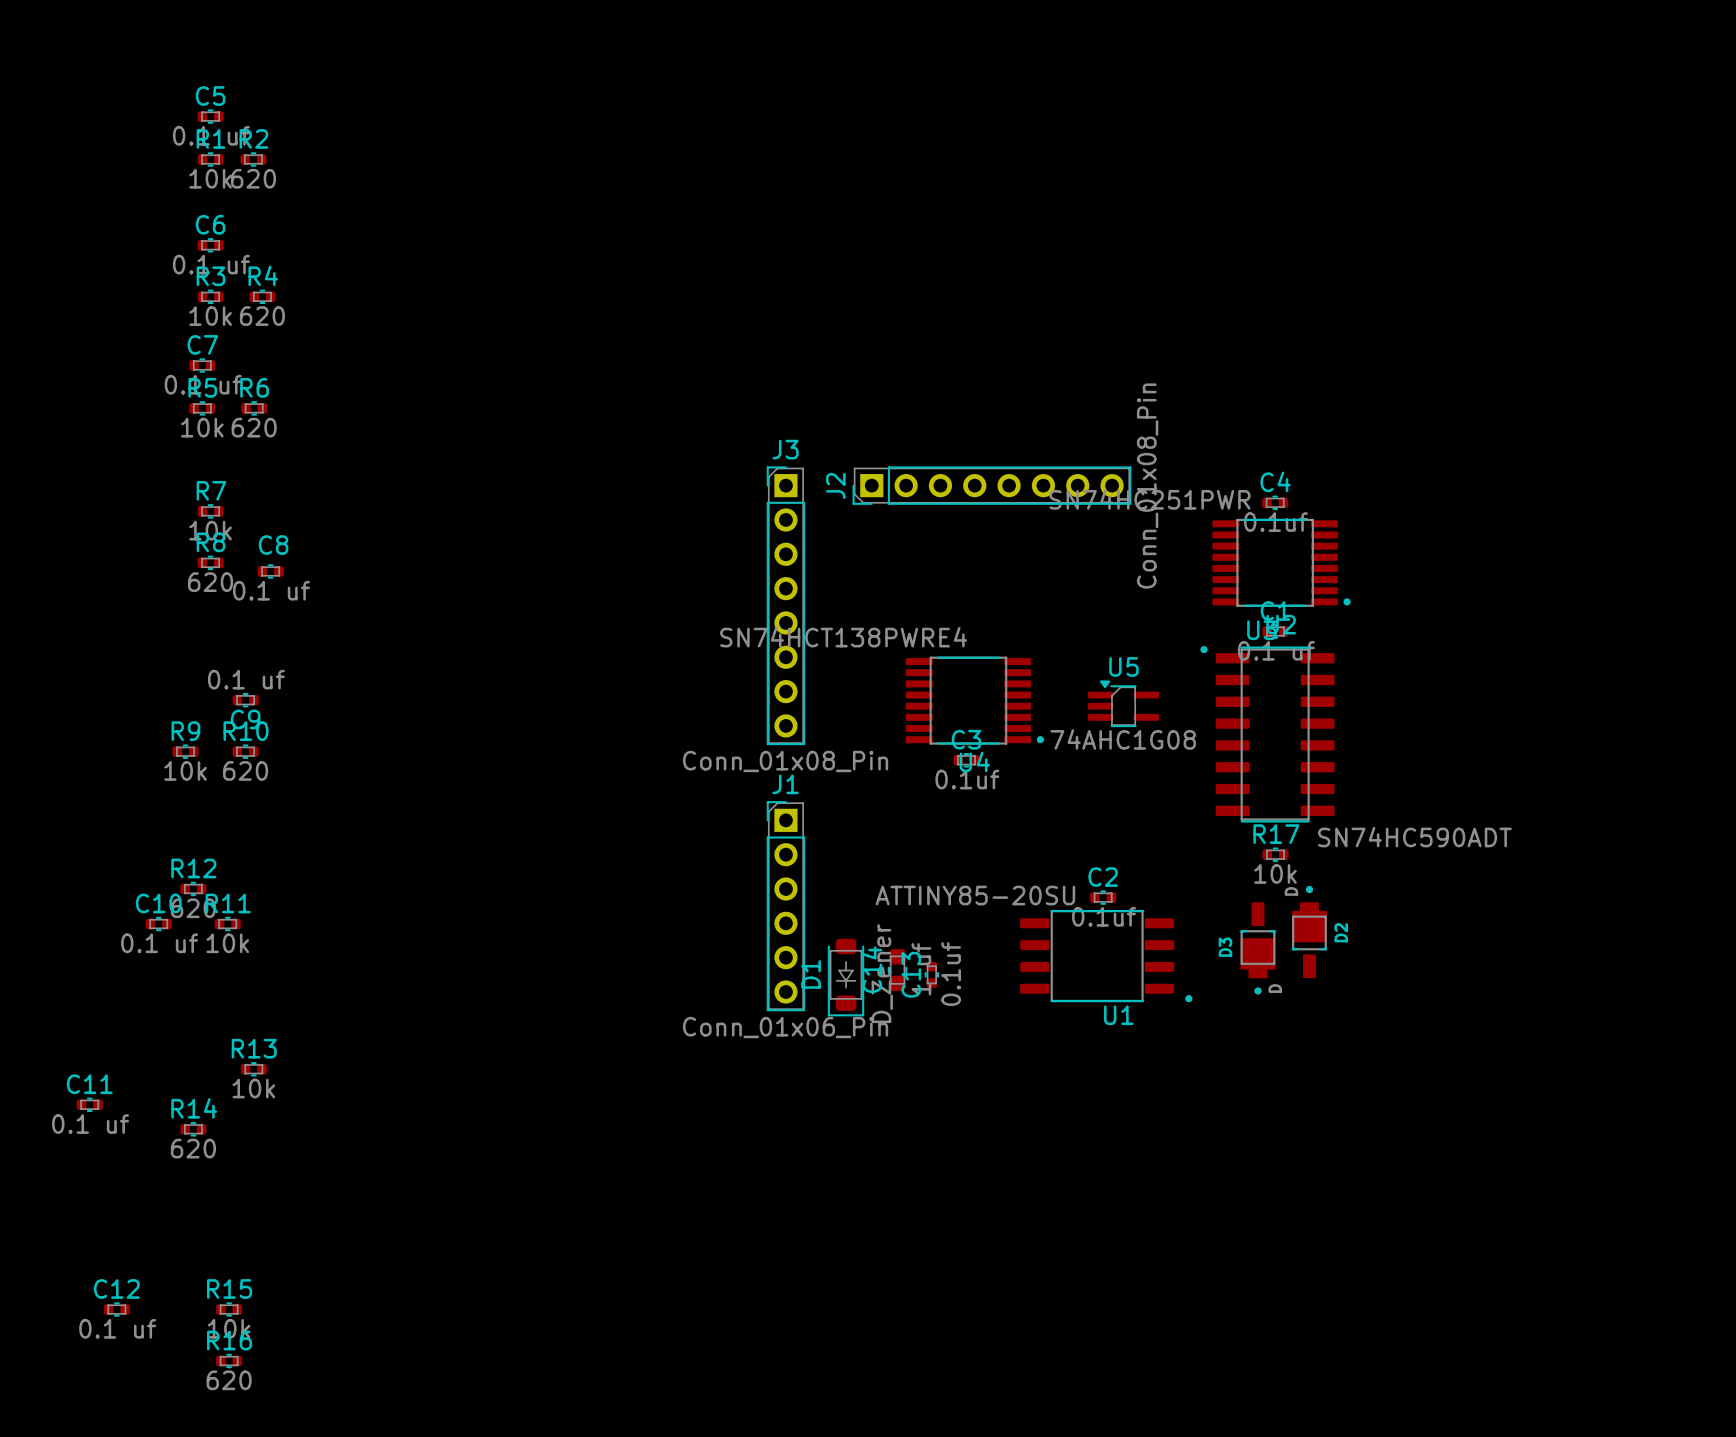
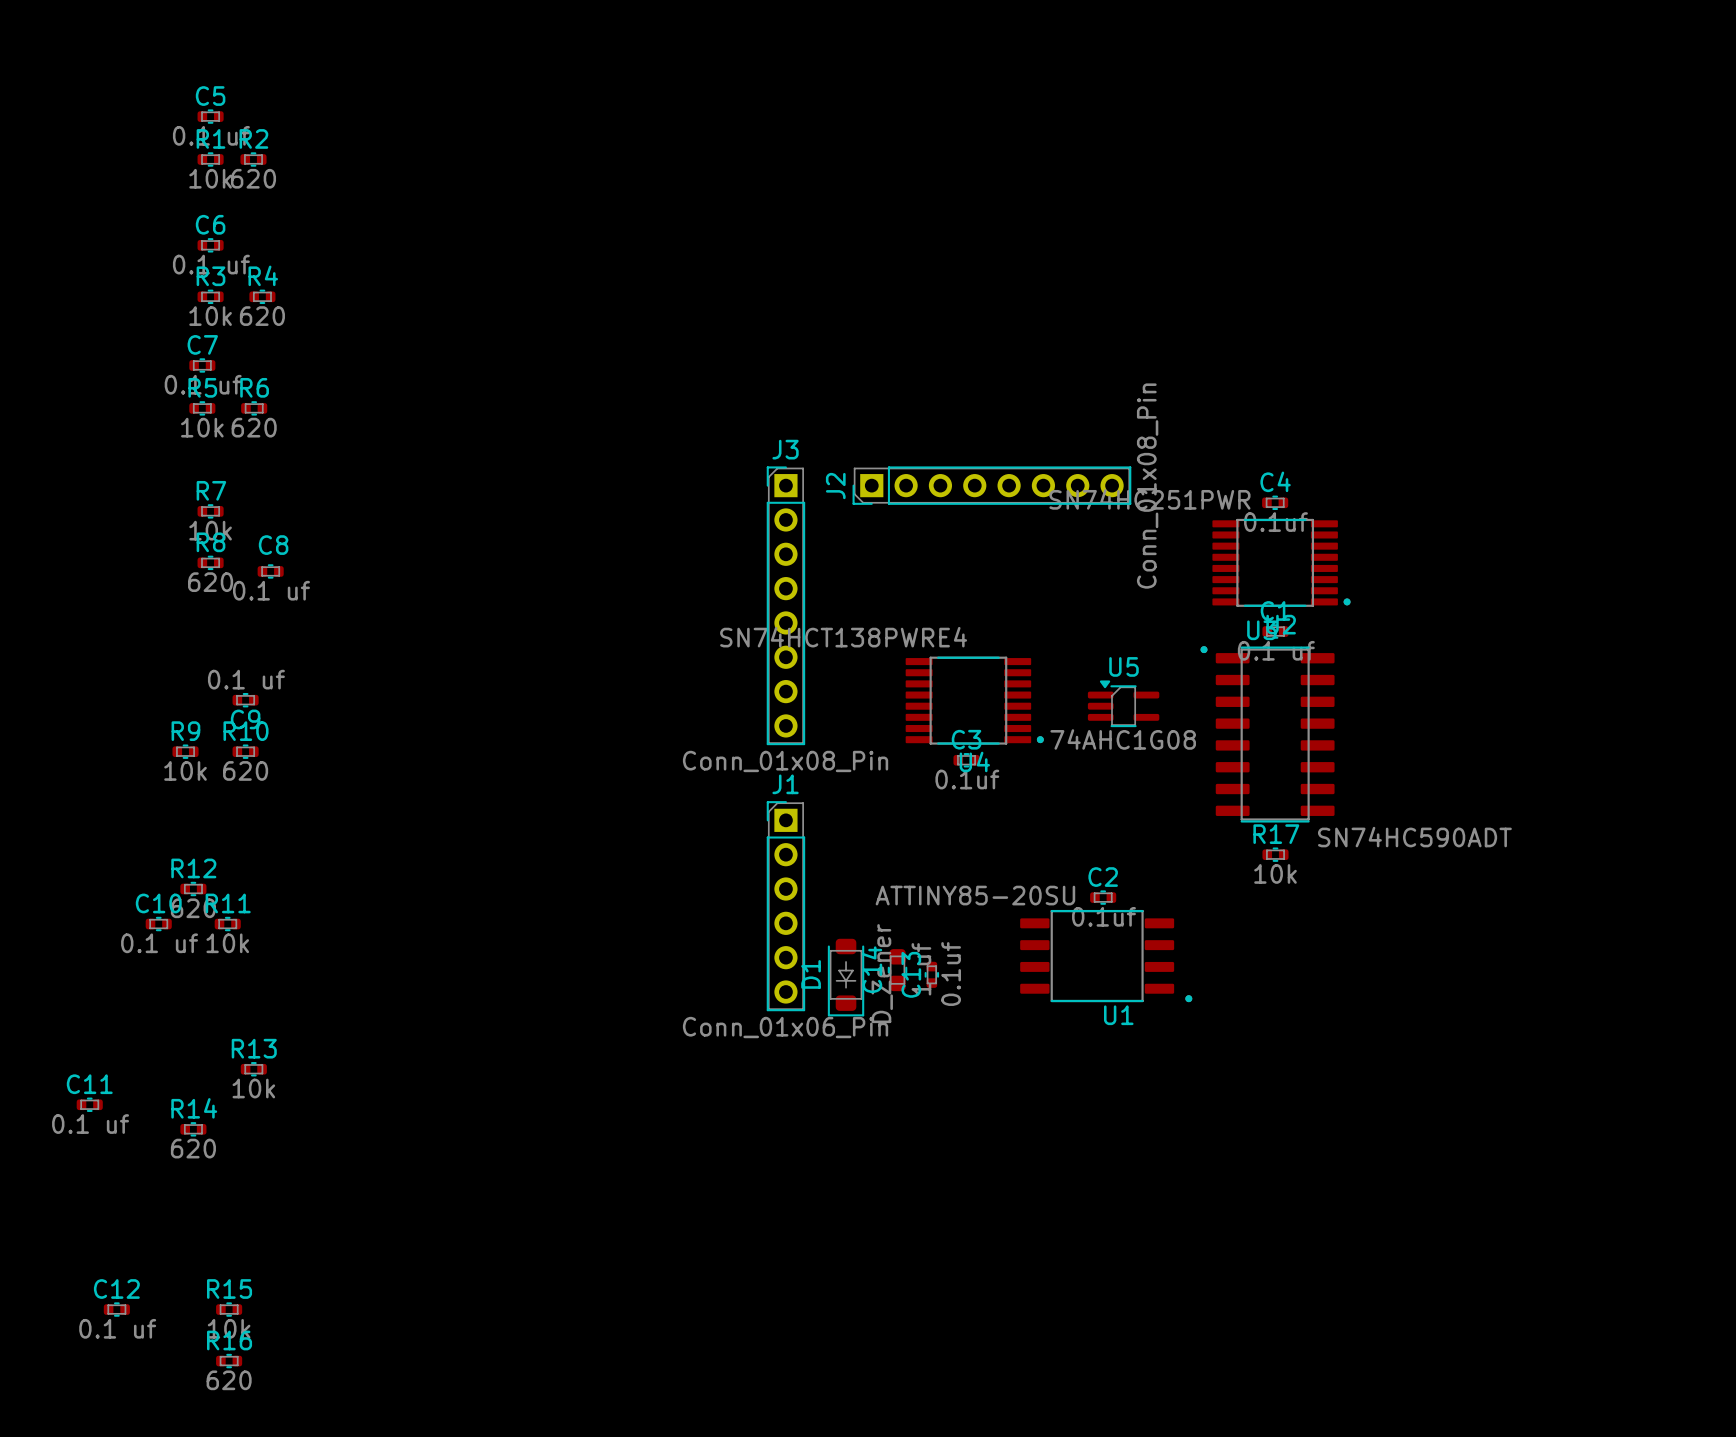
D2: D (1309, 932) -> none
D3: D (1257, 948) -> none

